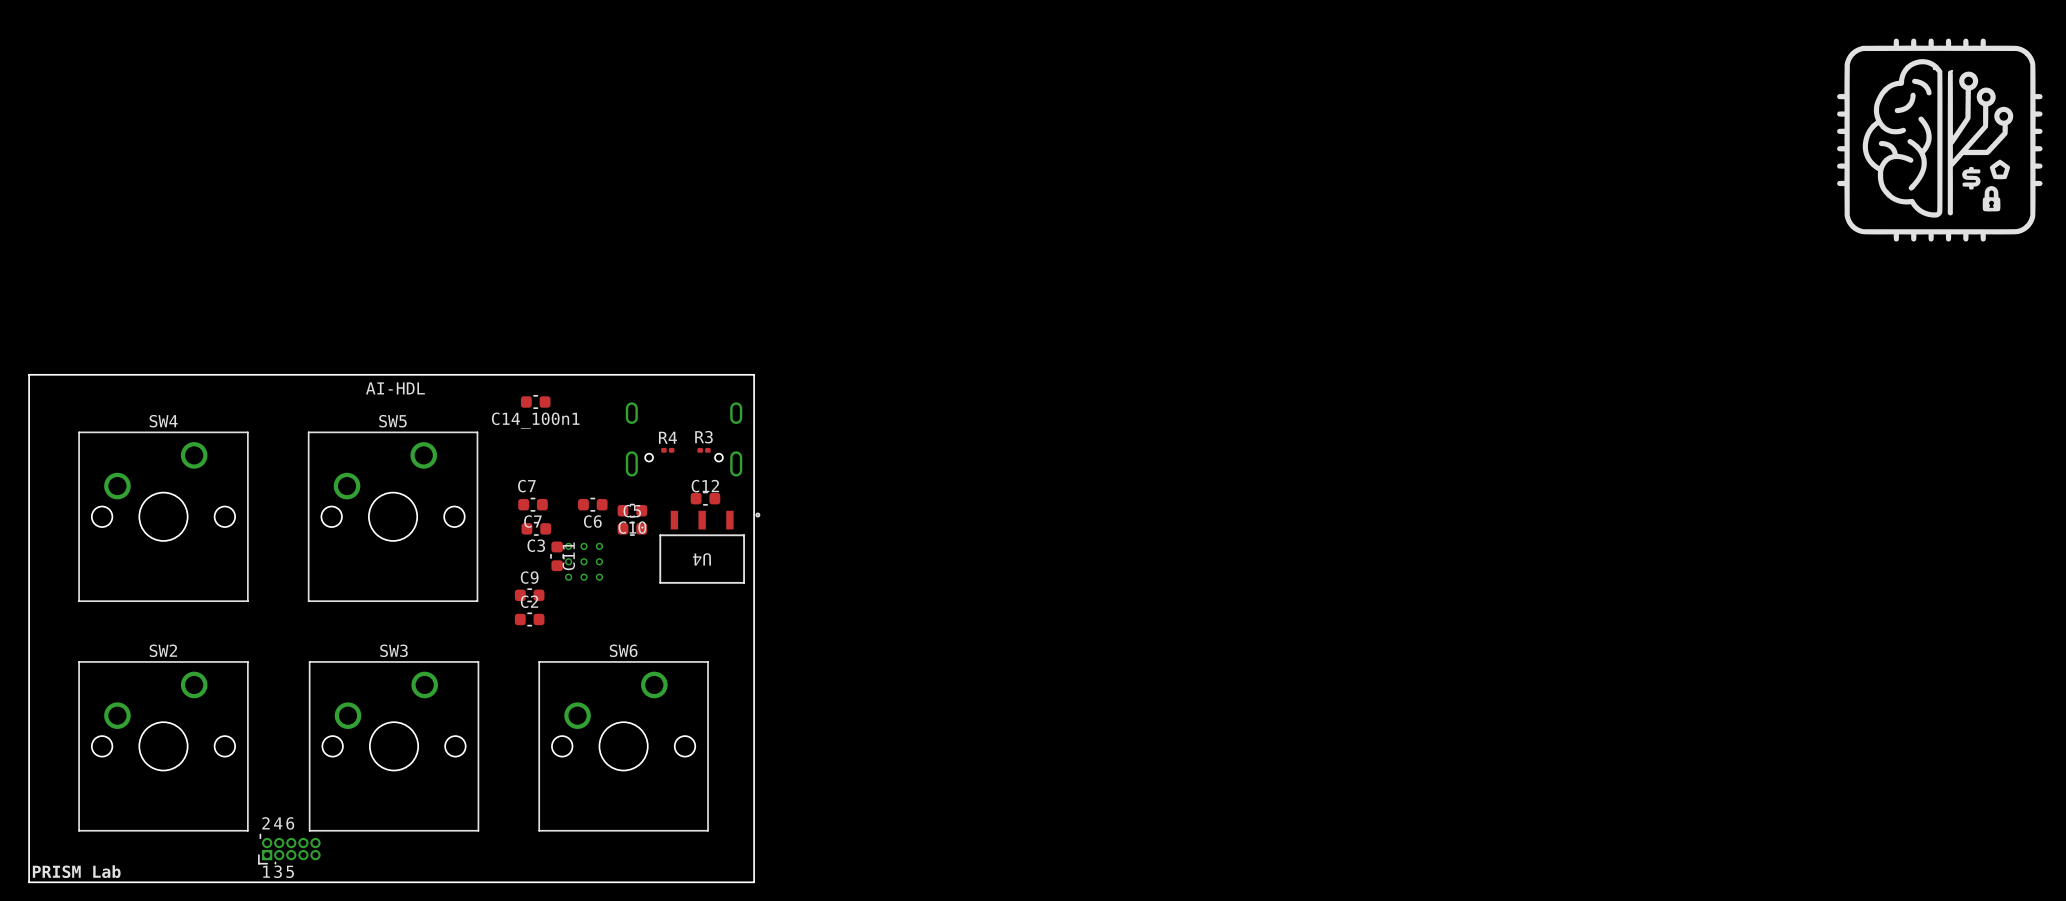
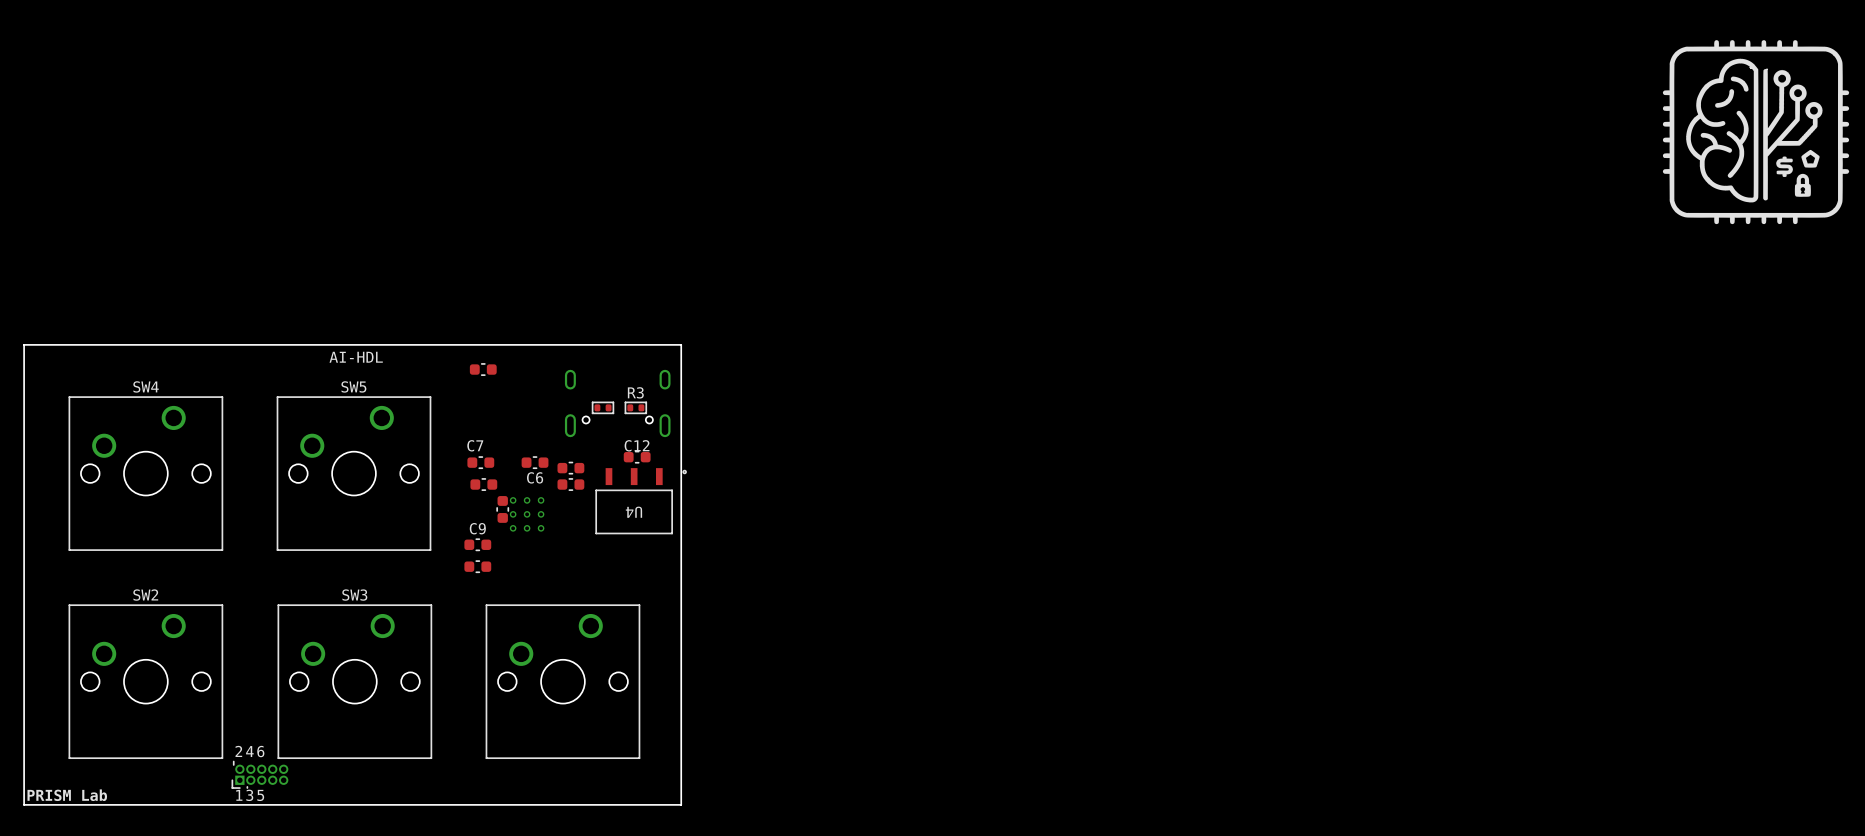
C14_100n1 name: C14_100n1 (535, 420) -> none
part: none -> (602, 407)
R3 footprint: [697, 447, 711, 453] -> [624, 401, 647, 415]
R4: (667, 450) -> none
C5 name: C5 (632, 511) -> none
C7 name: C7 (532, 521) -> none
C10 name: C10 (632, 527) -> none
C3 name: C3 (536, 545) -> none
C11 name: C11 (568, 556) -> none
C2 name: C2 (529, 601) -> none
SW6 name: SW6 (623, 650) -> none

